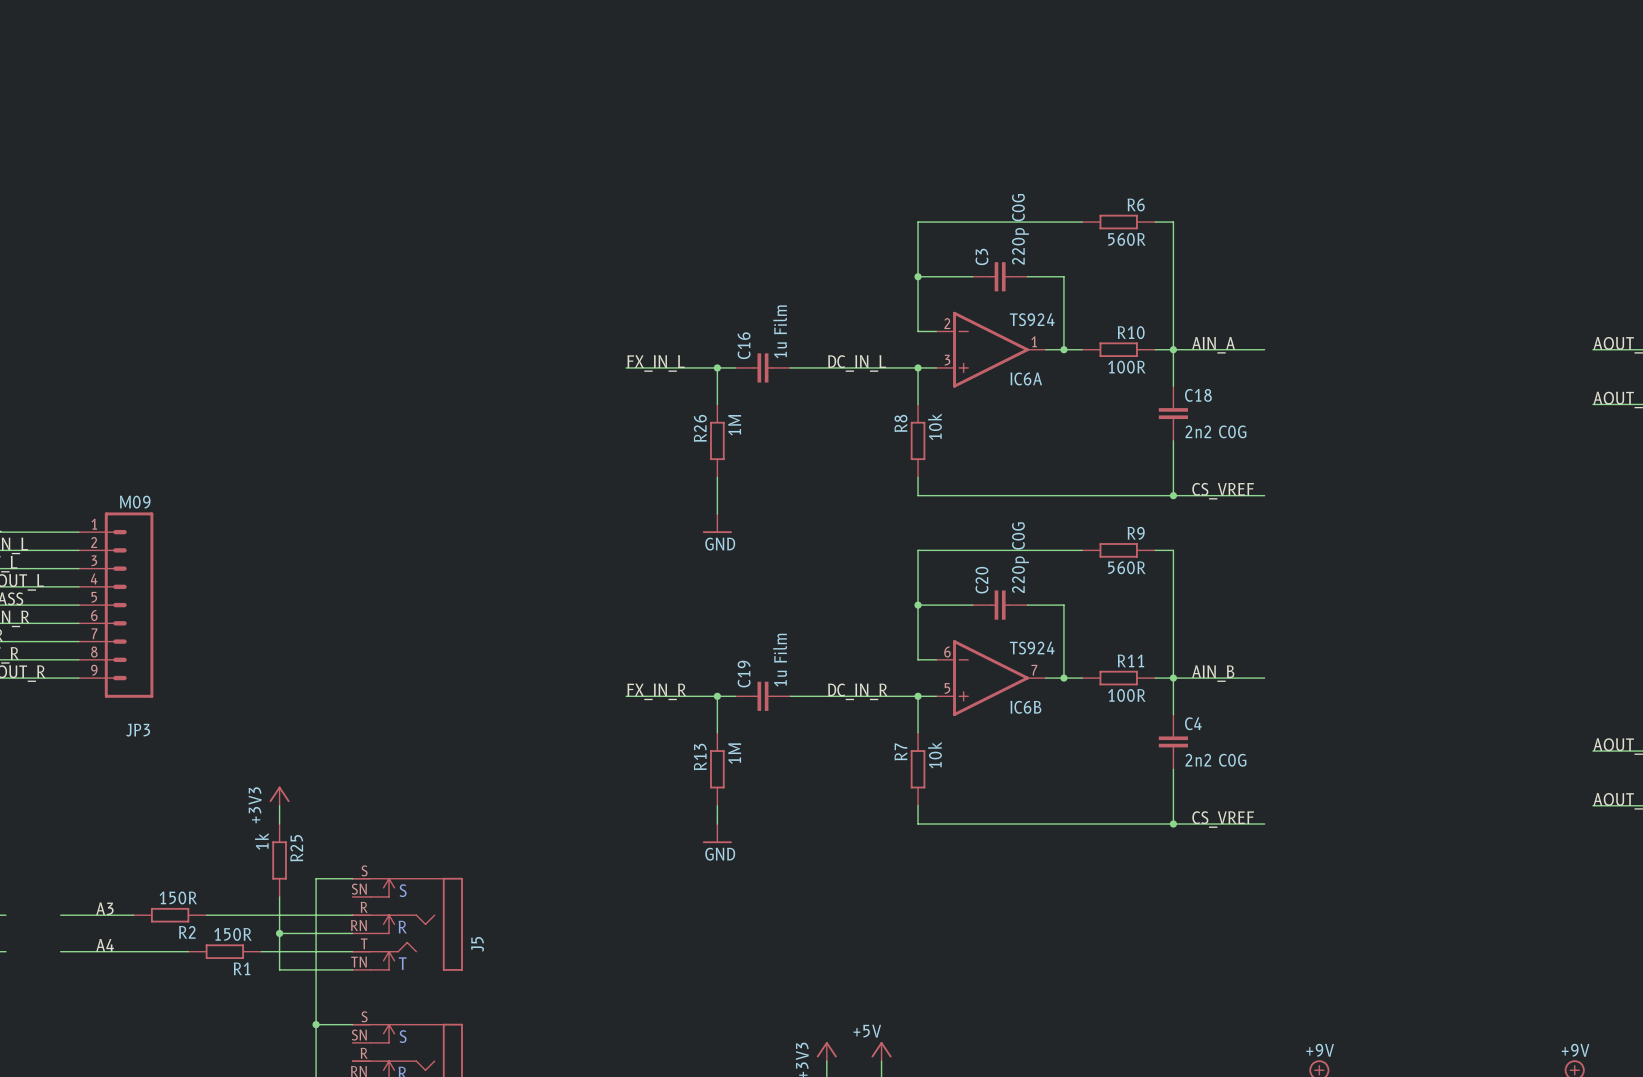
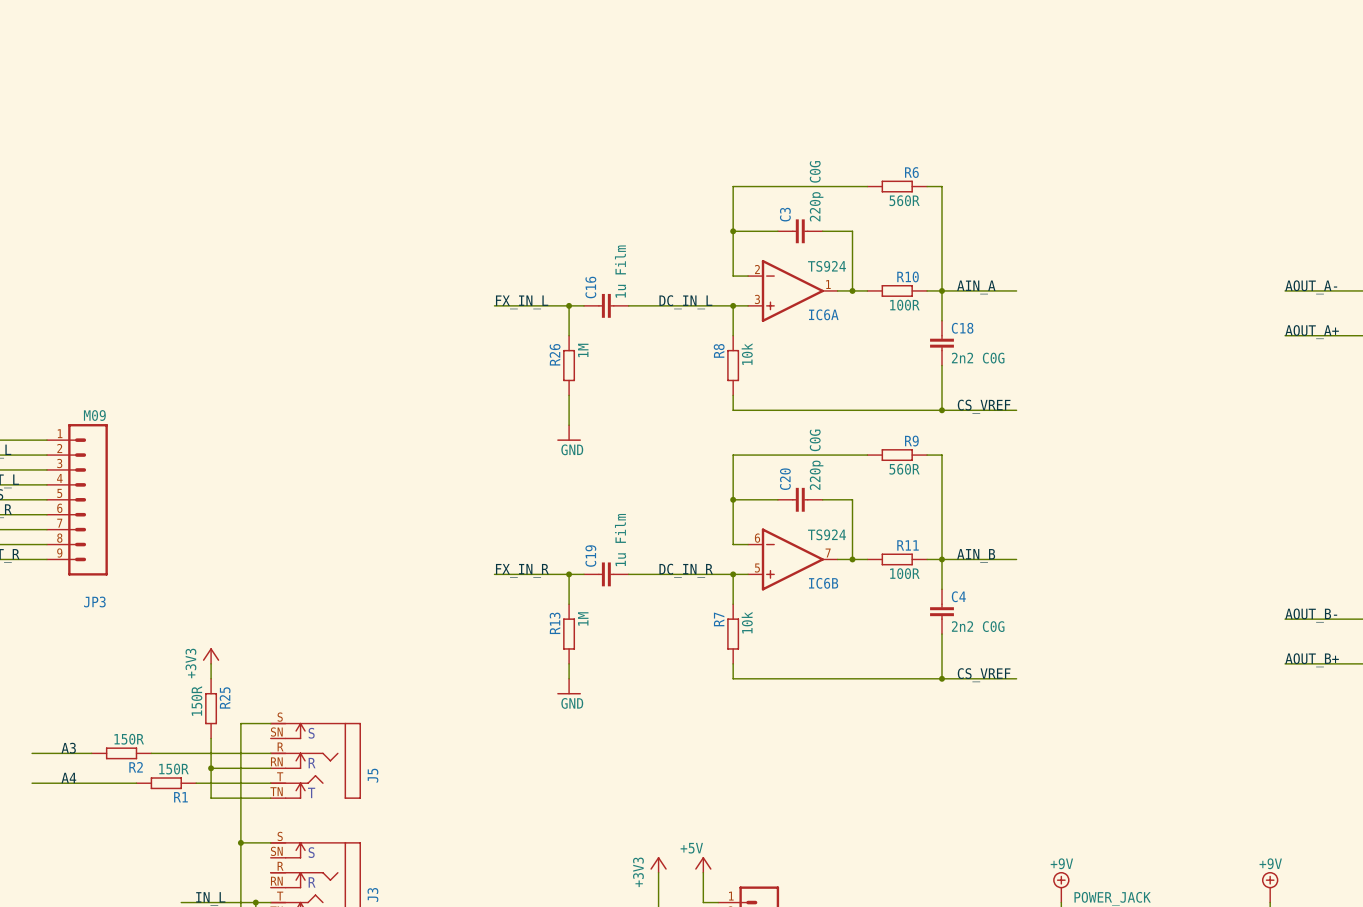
R25 value: 1k (261, 841) -> 150R (196, 701)

